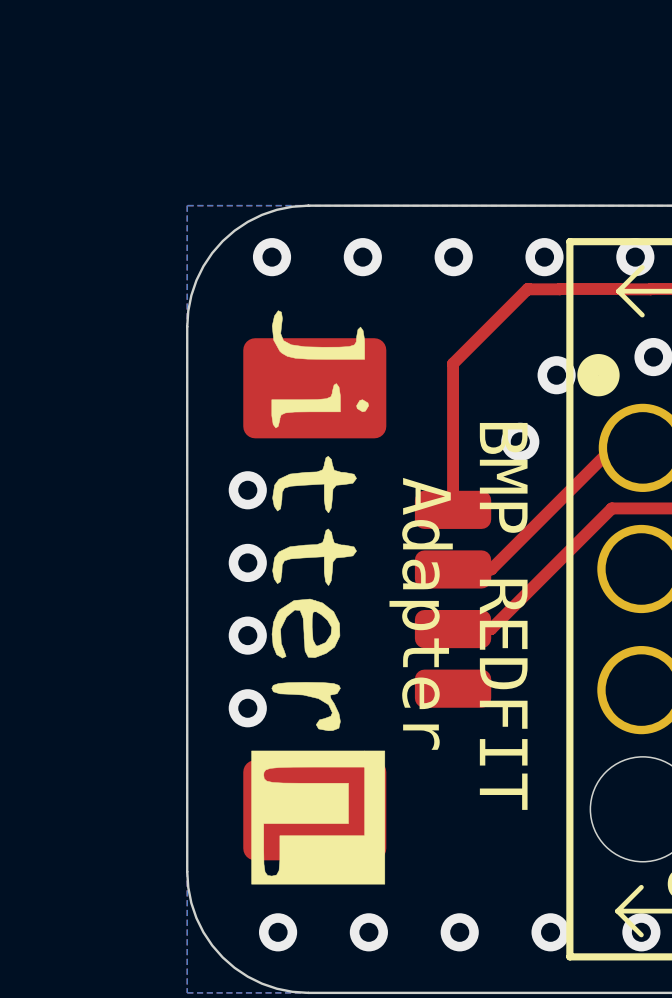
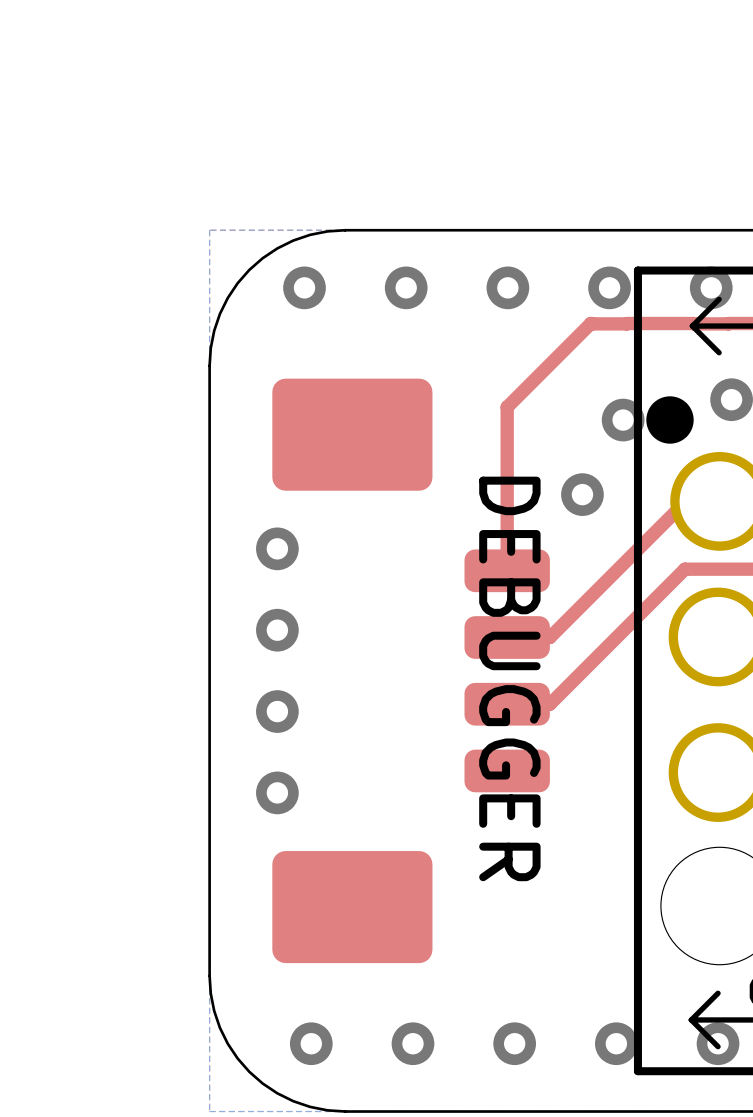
drawing: [251, 310, 386, 885] -> none
text: none -> DEBUGGER (509, 678)
text: Adapter (421, 613) -> none
text: BMP REDFIT (503, 616) -> none

